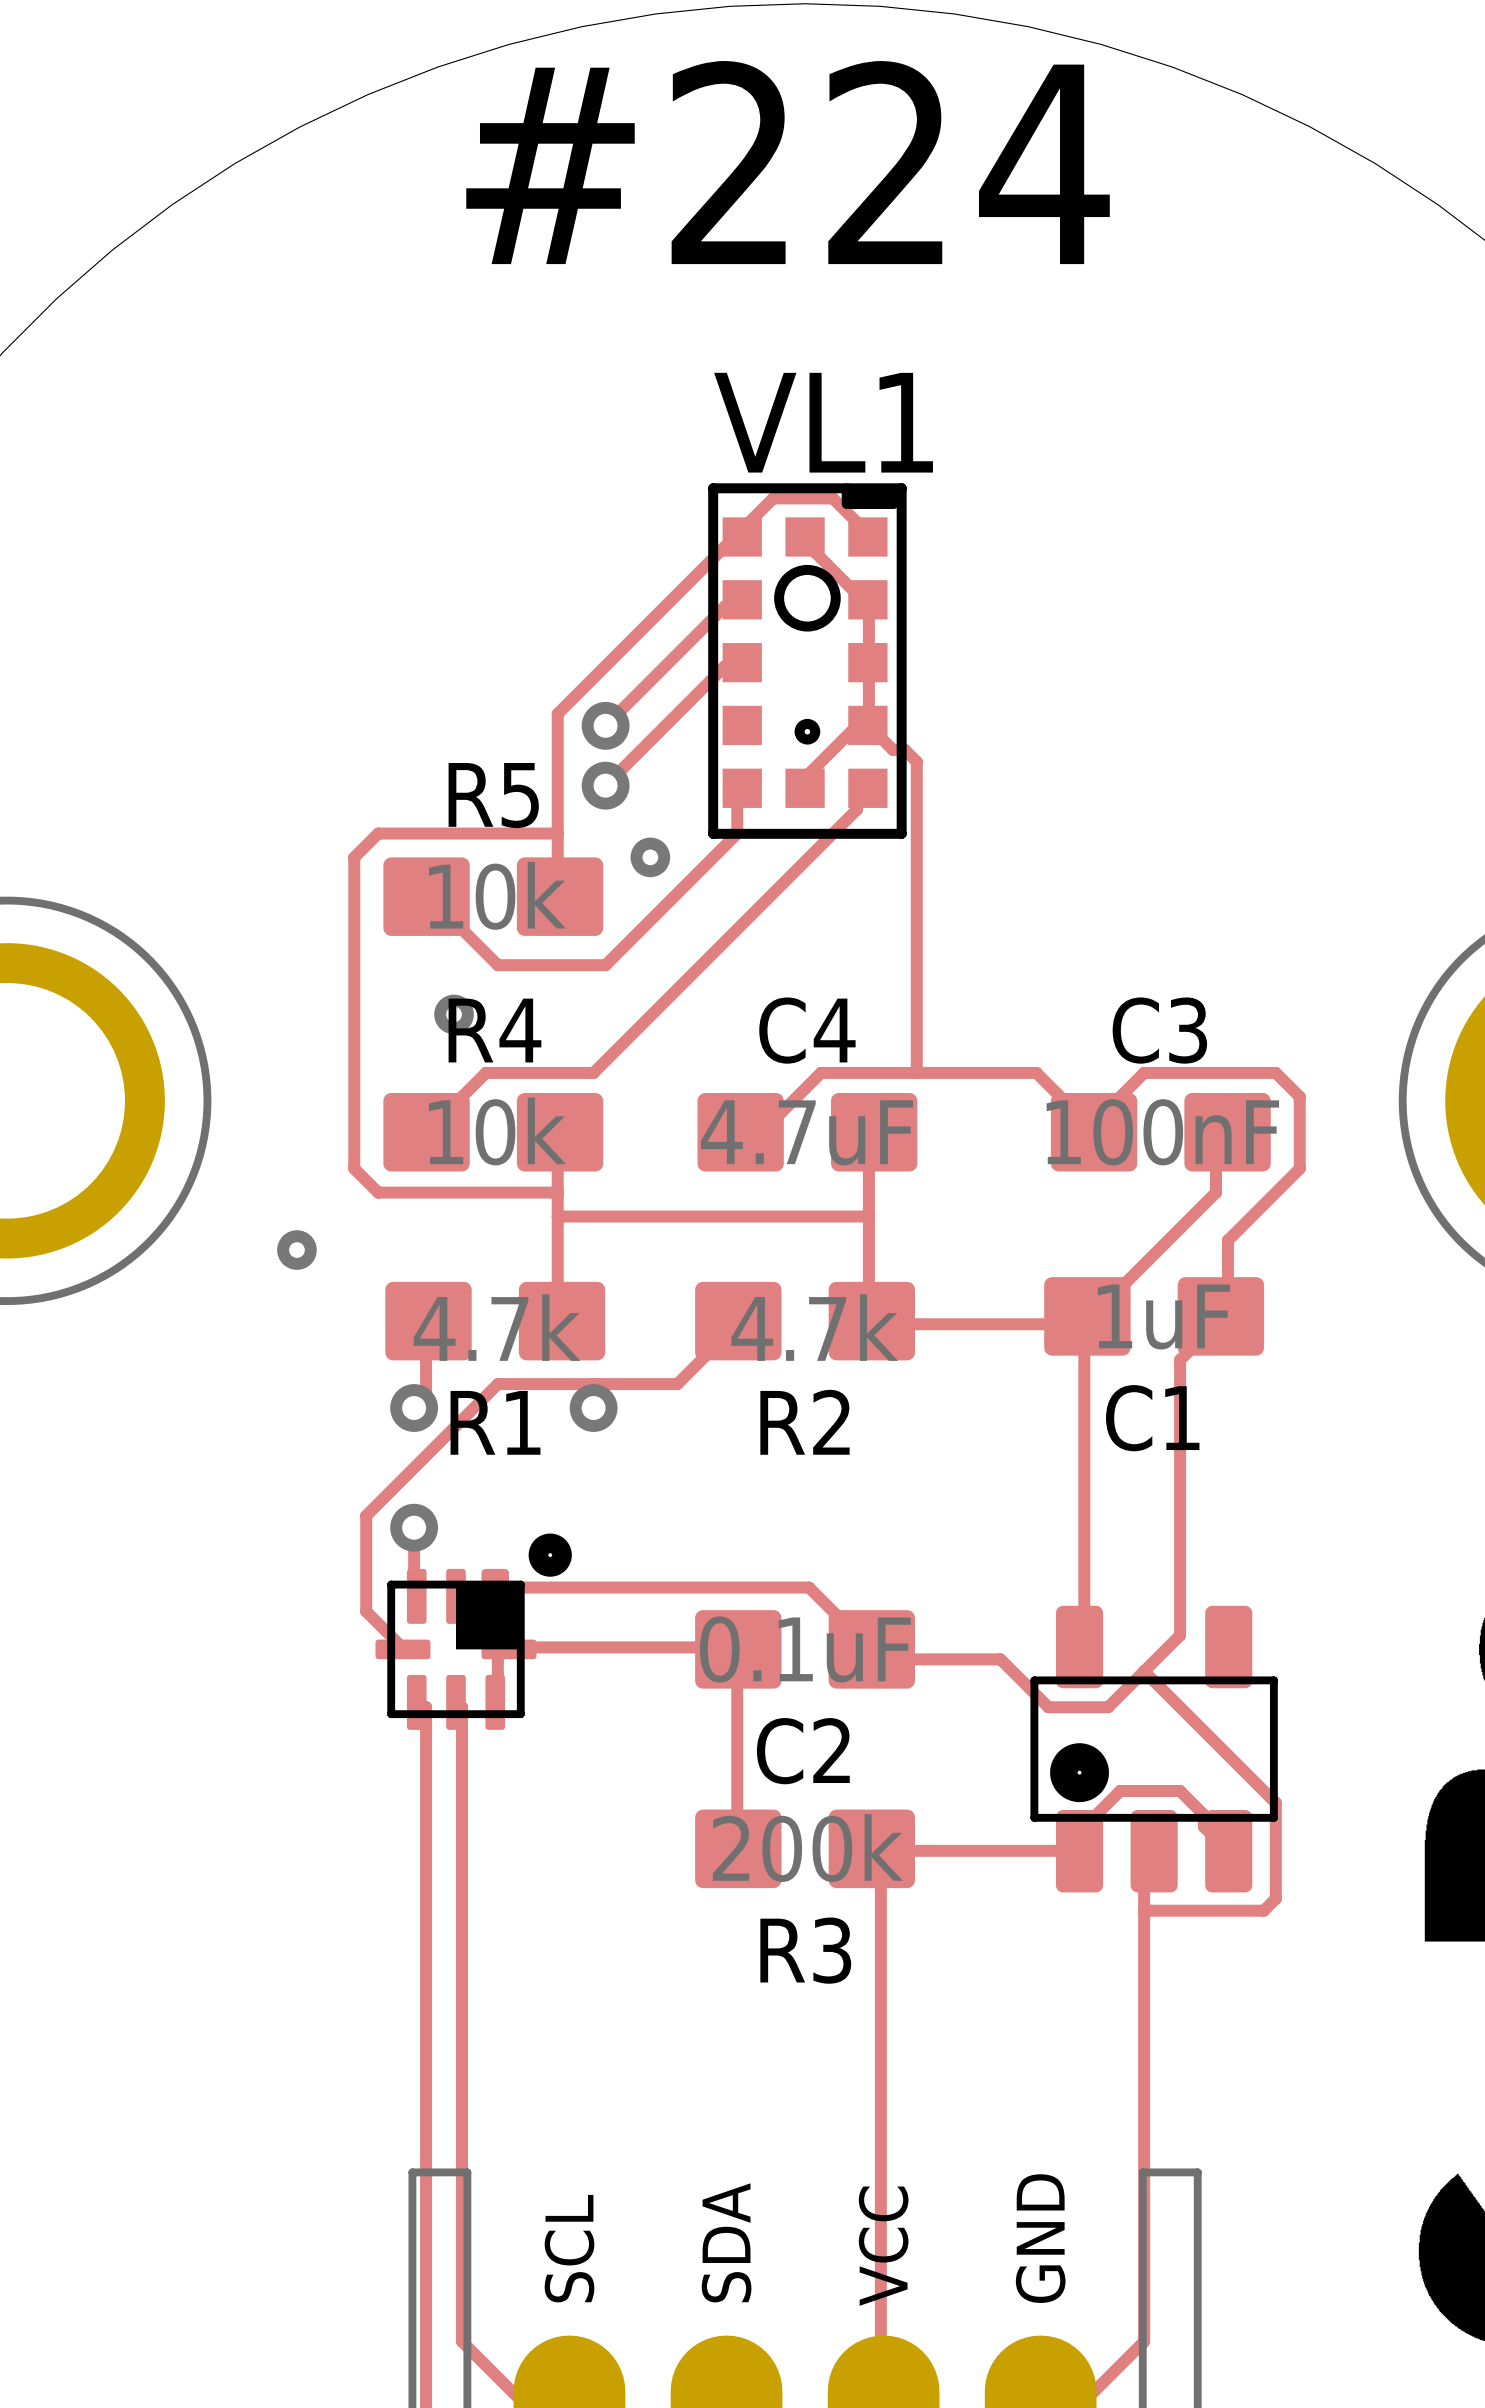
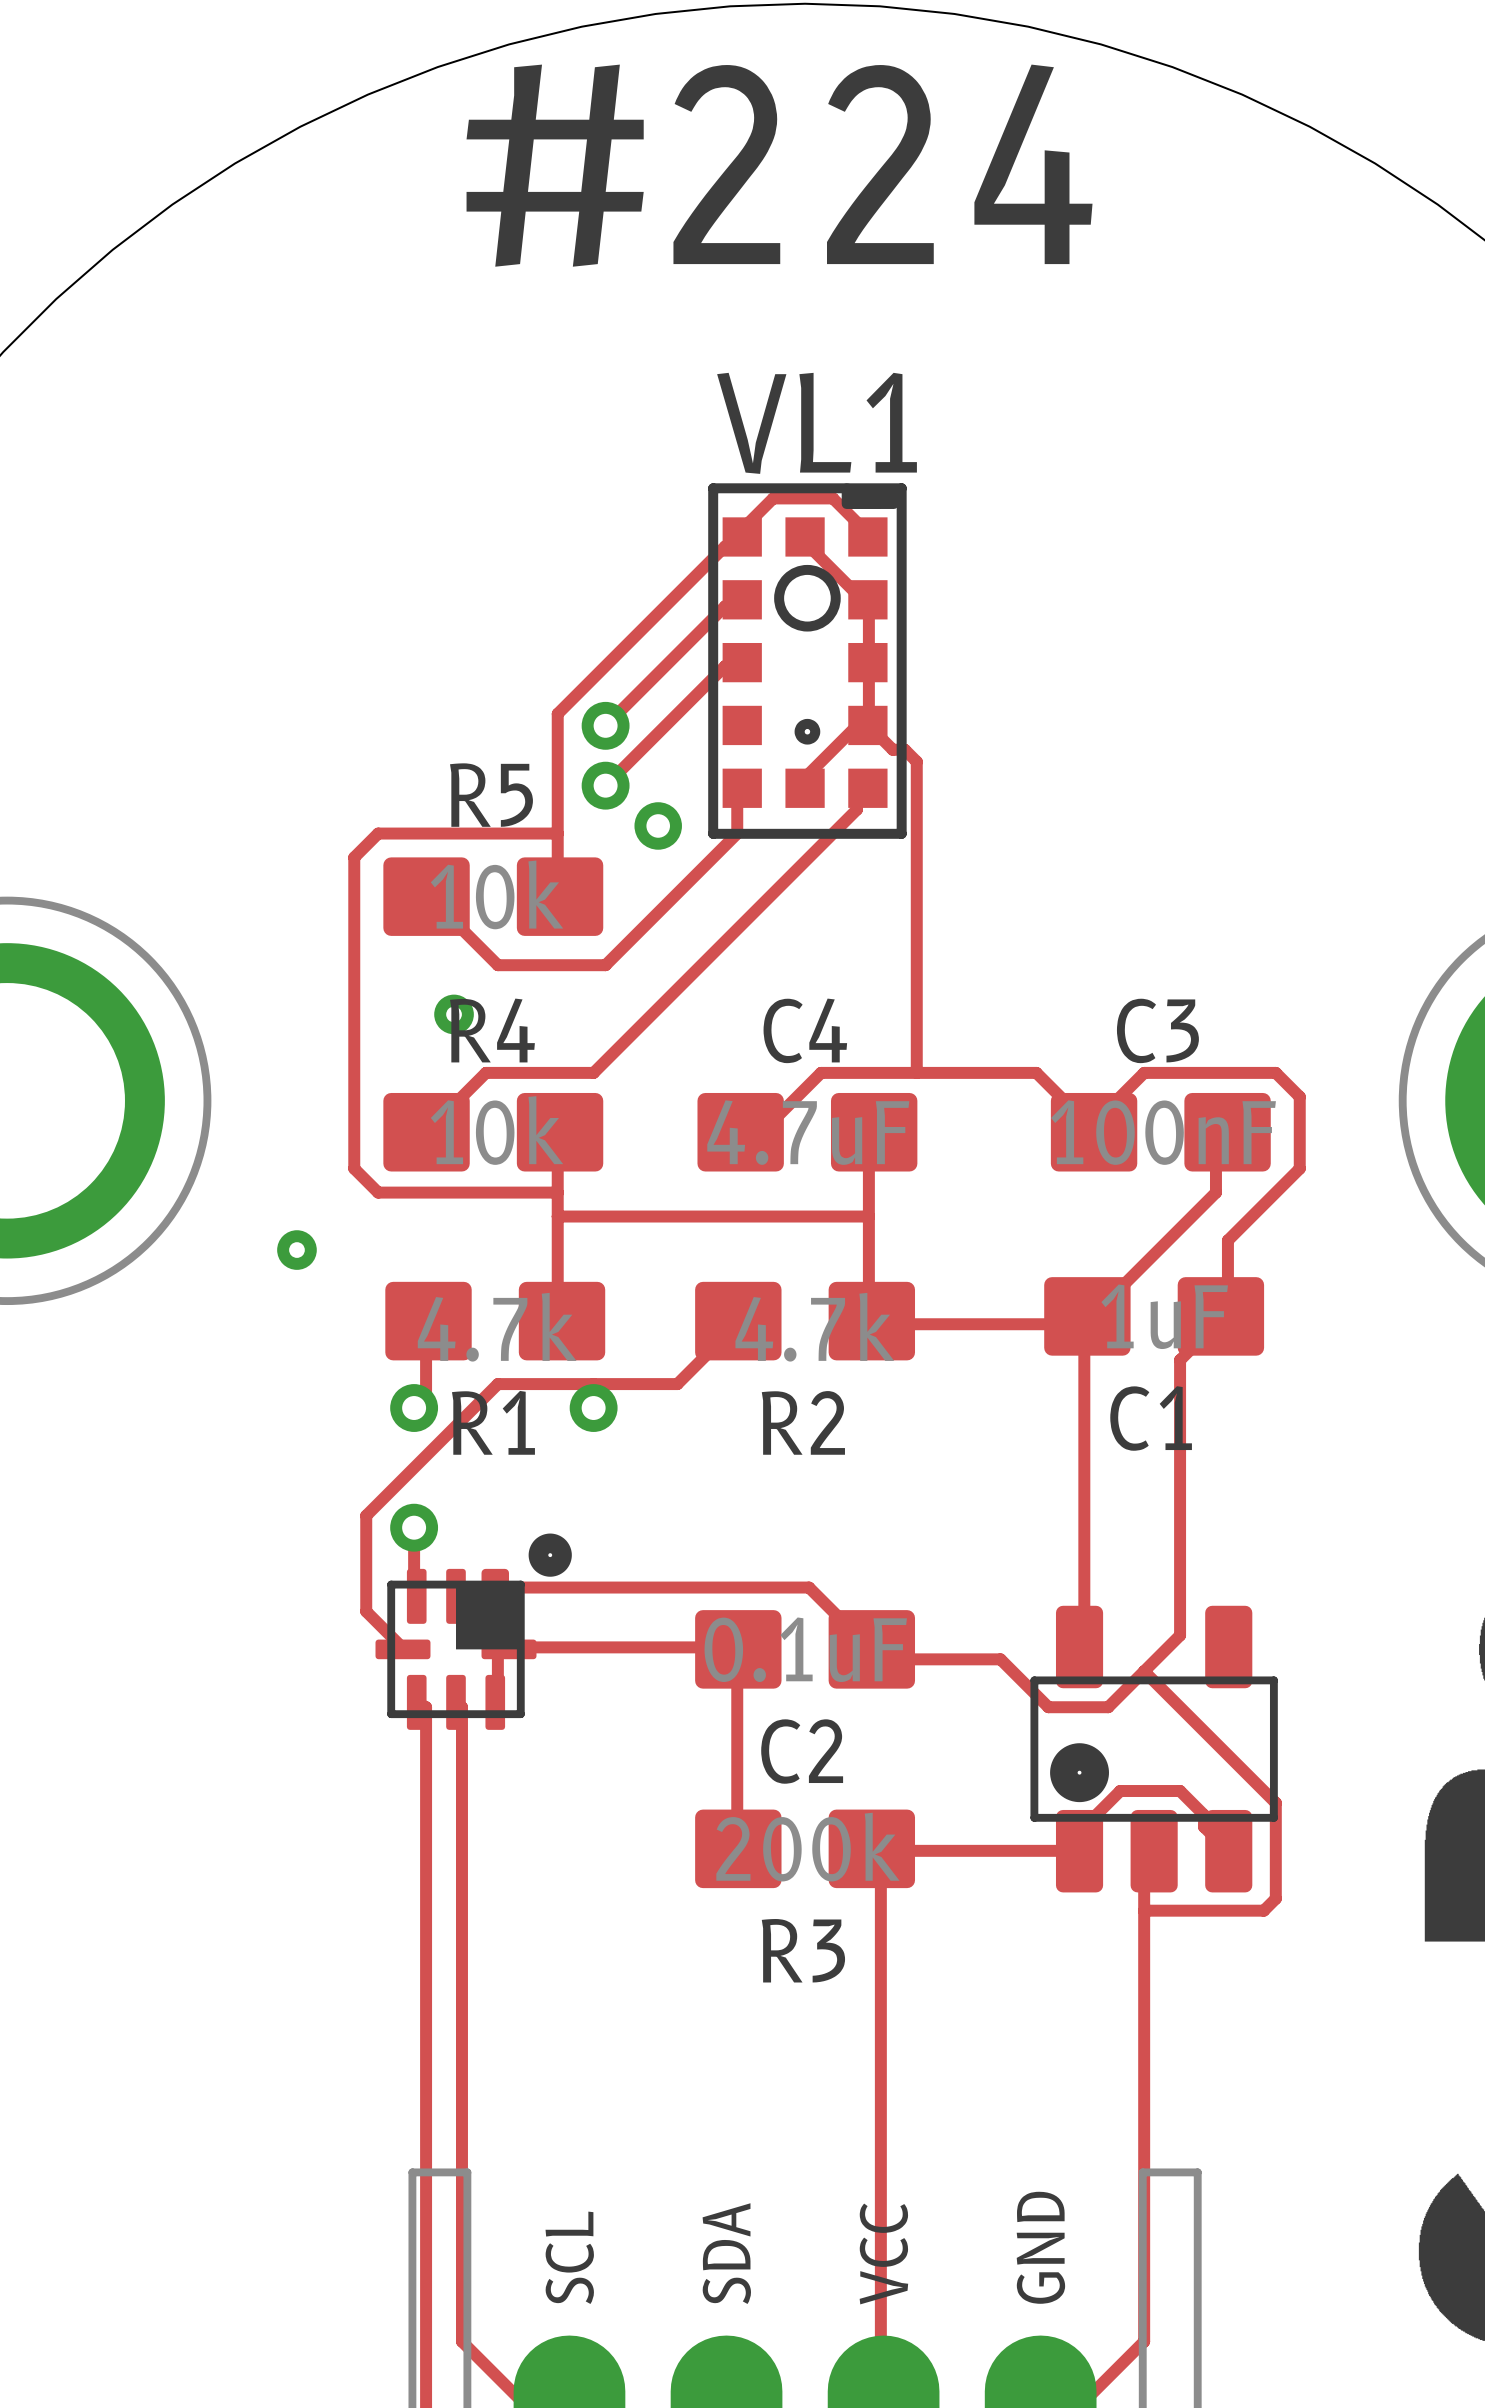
via position: (650, 857) -> (658, 825)

